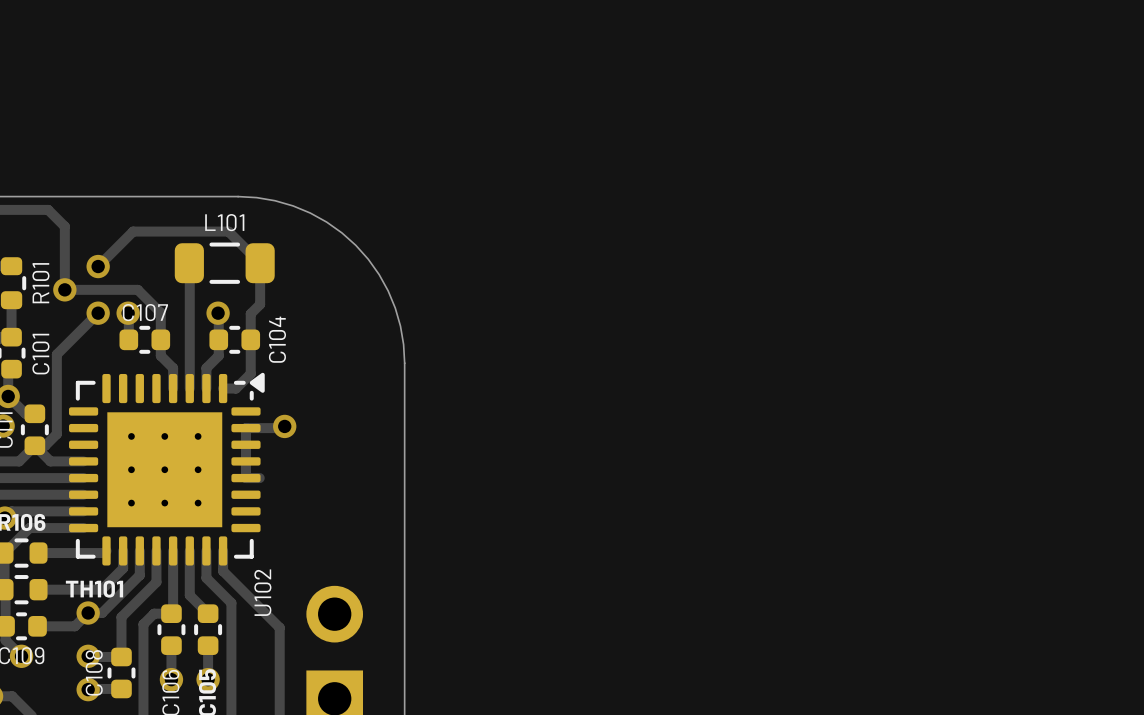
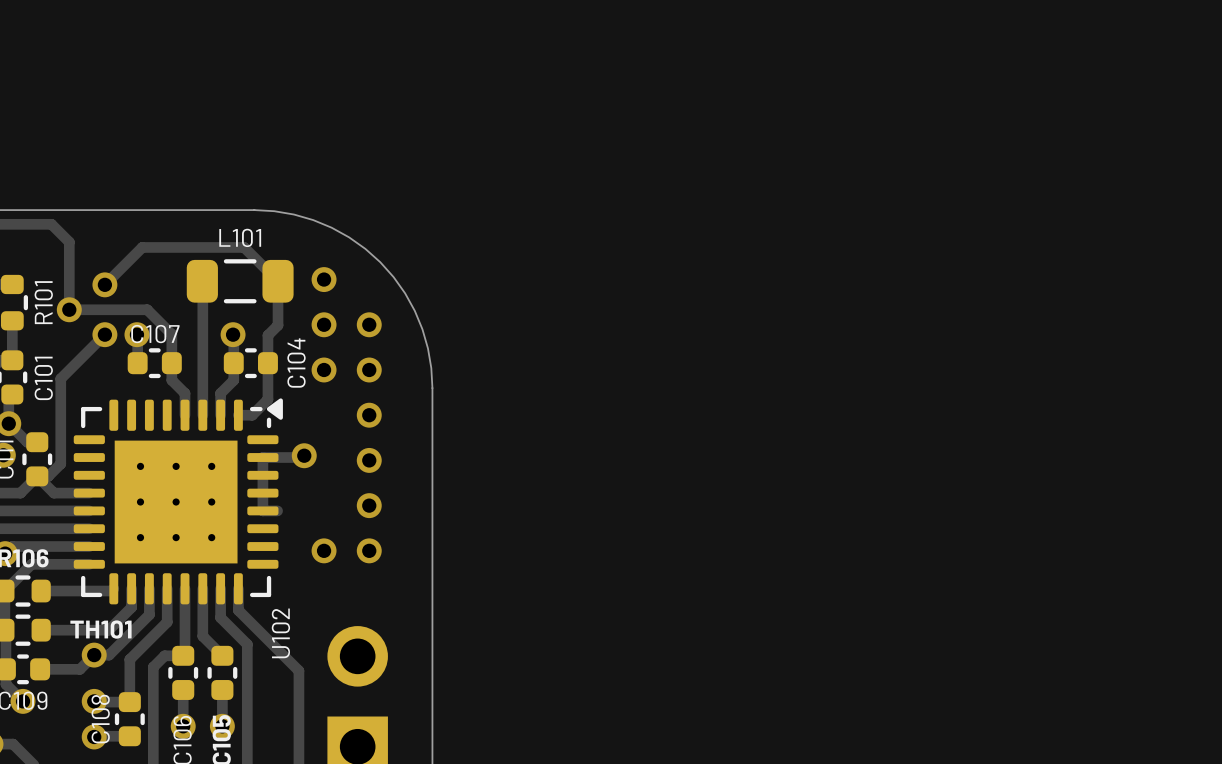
via: none -> (324, 279)
via: none -> (324, 324)
via: none -> (369, 324)
via: none -> (324, 369)
via: none -> (369, 369)
via: none -> (369, 415)
via: none -> (369, 460)
via: none -> (369, 505)
via: none -> (324, 550)
via: none -> (369, 550)

